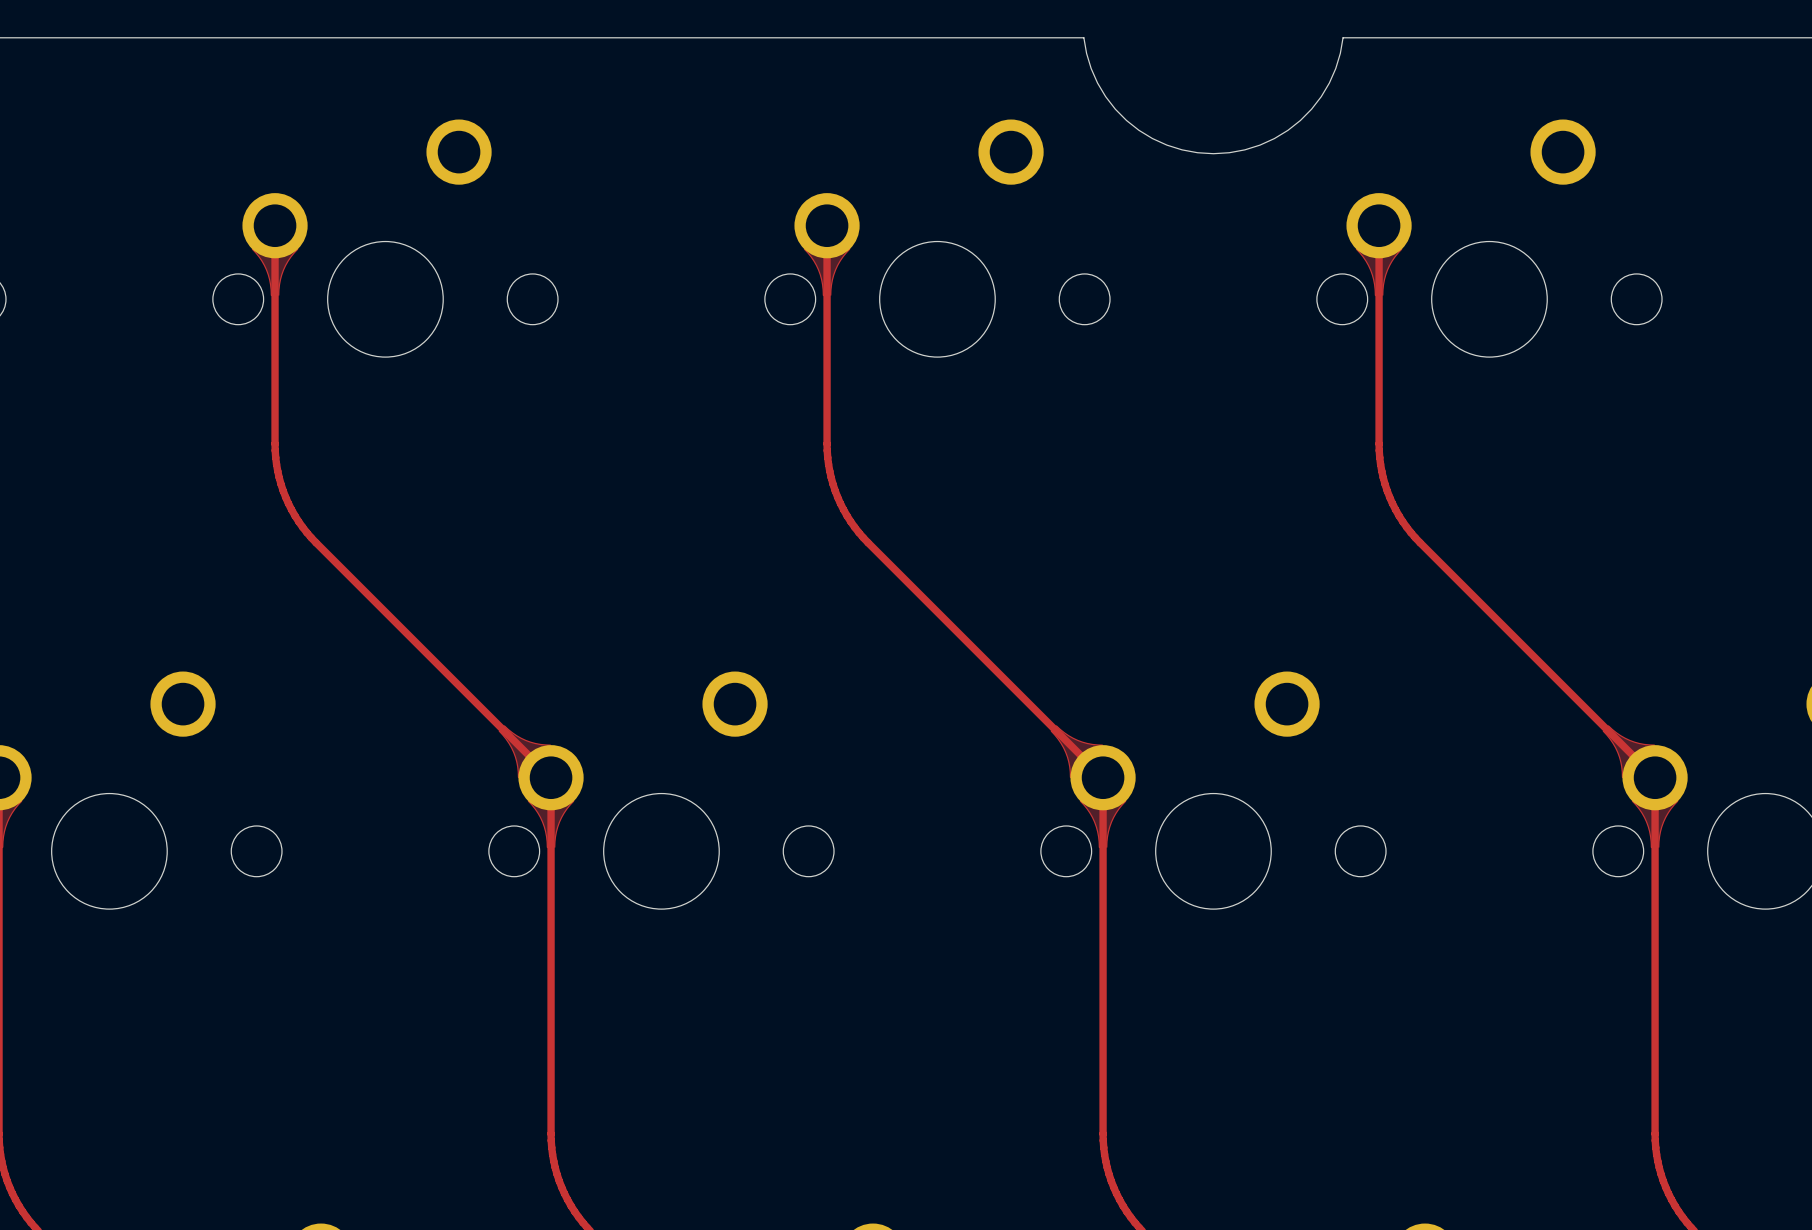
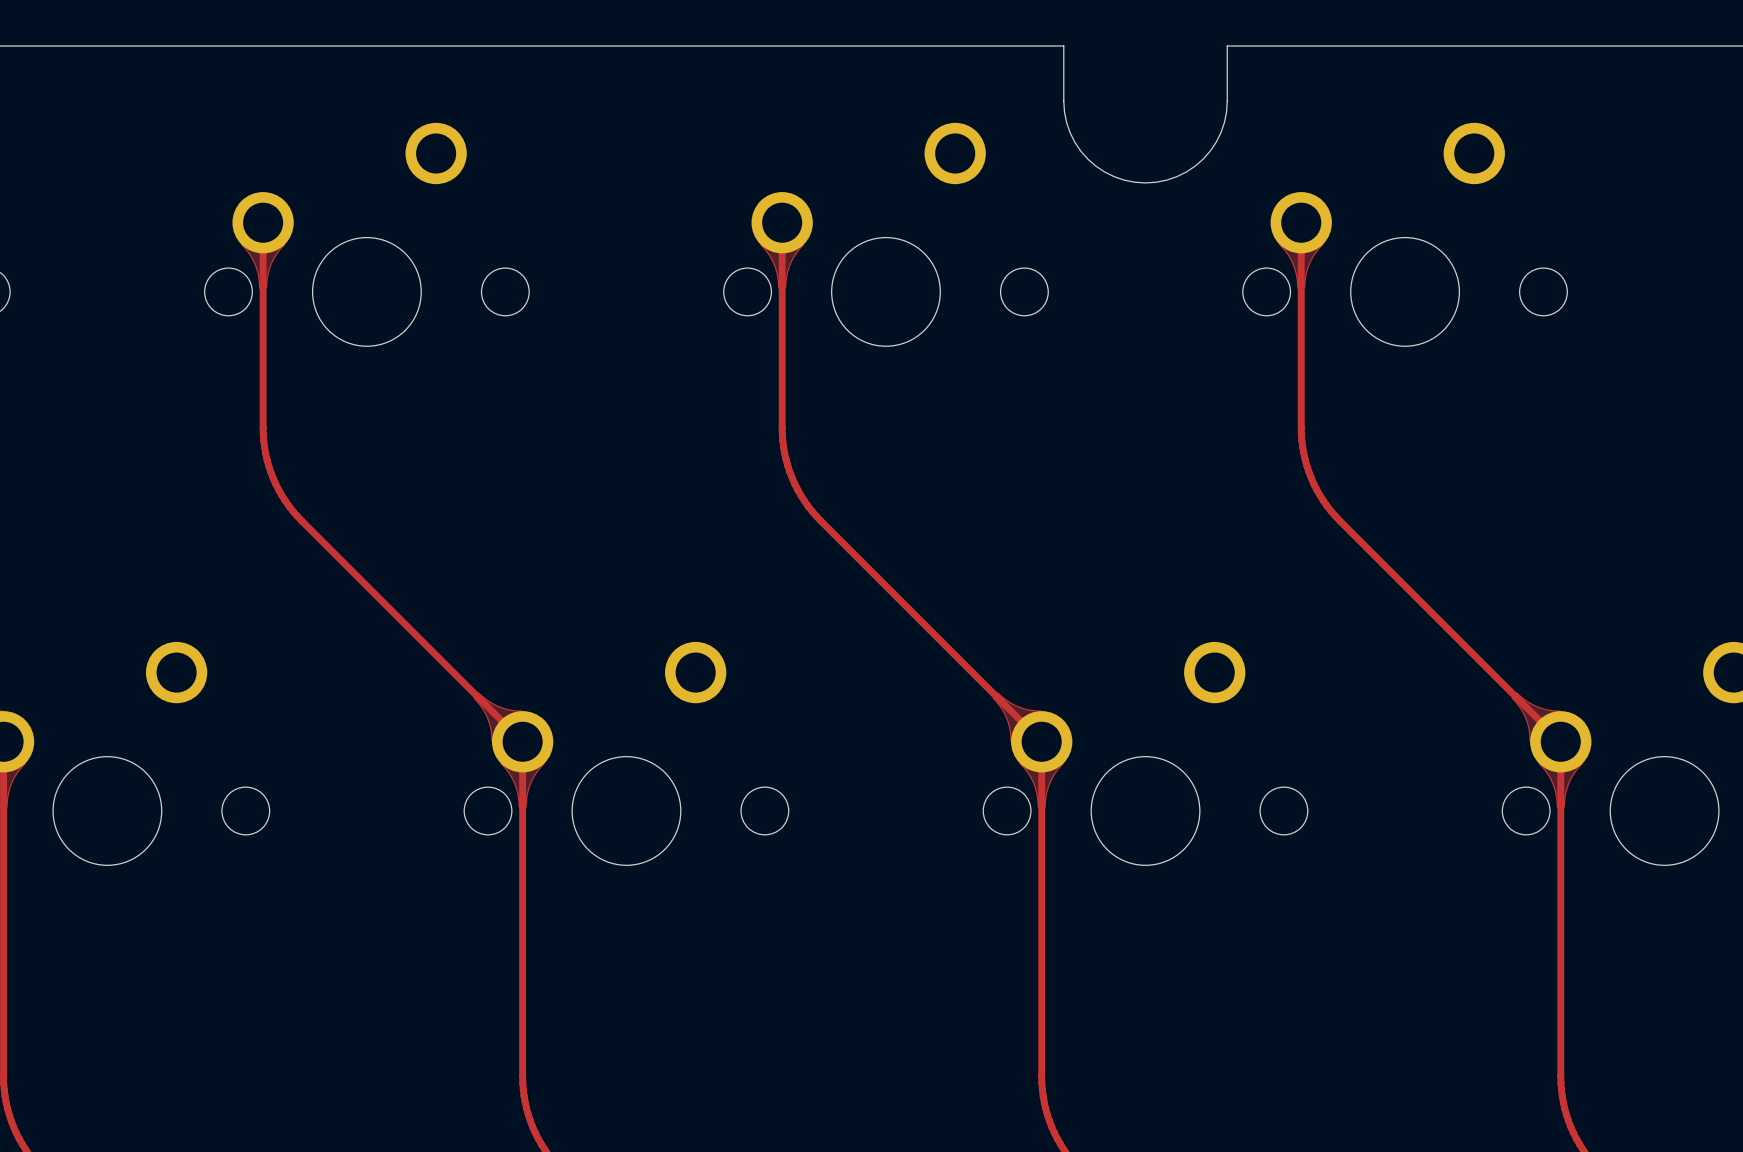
board edge: (1083, 37) (1091, 68) (1097, 83) (1115, 109) (1126, 120) (1152, 138) (1166, 145) (1182, 149) (1213, 153) (1229, 152) (1259, 145) (1274, 138) (1300, 120) (1321, 96) (1329, 83) (1335, 68) (1343, 37) -> (1023, 46) (1063, 46) (1064, 111) (1074, 142) (1087, 158) (1104, 171) (1124, 180) (1145, 182) (1166, 180) (1186, 171) (1203, 158) (1216, 142) (1226, 111) (1227, 46) (1267, 46)

